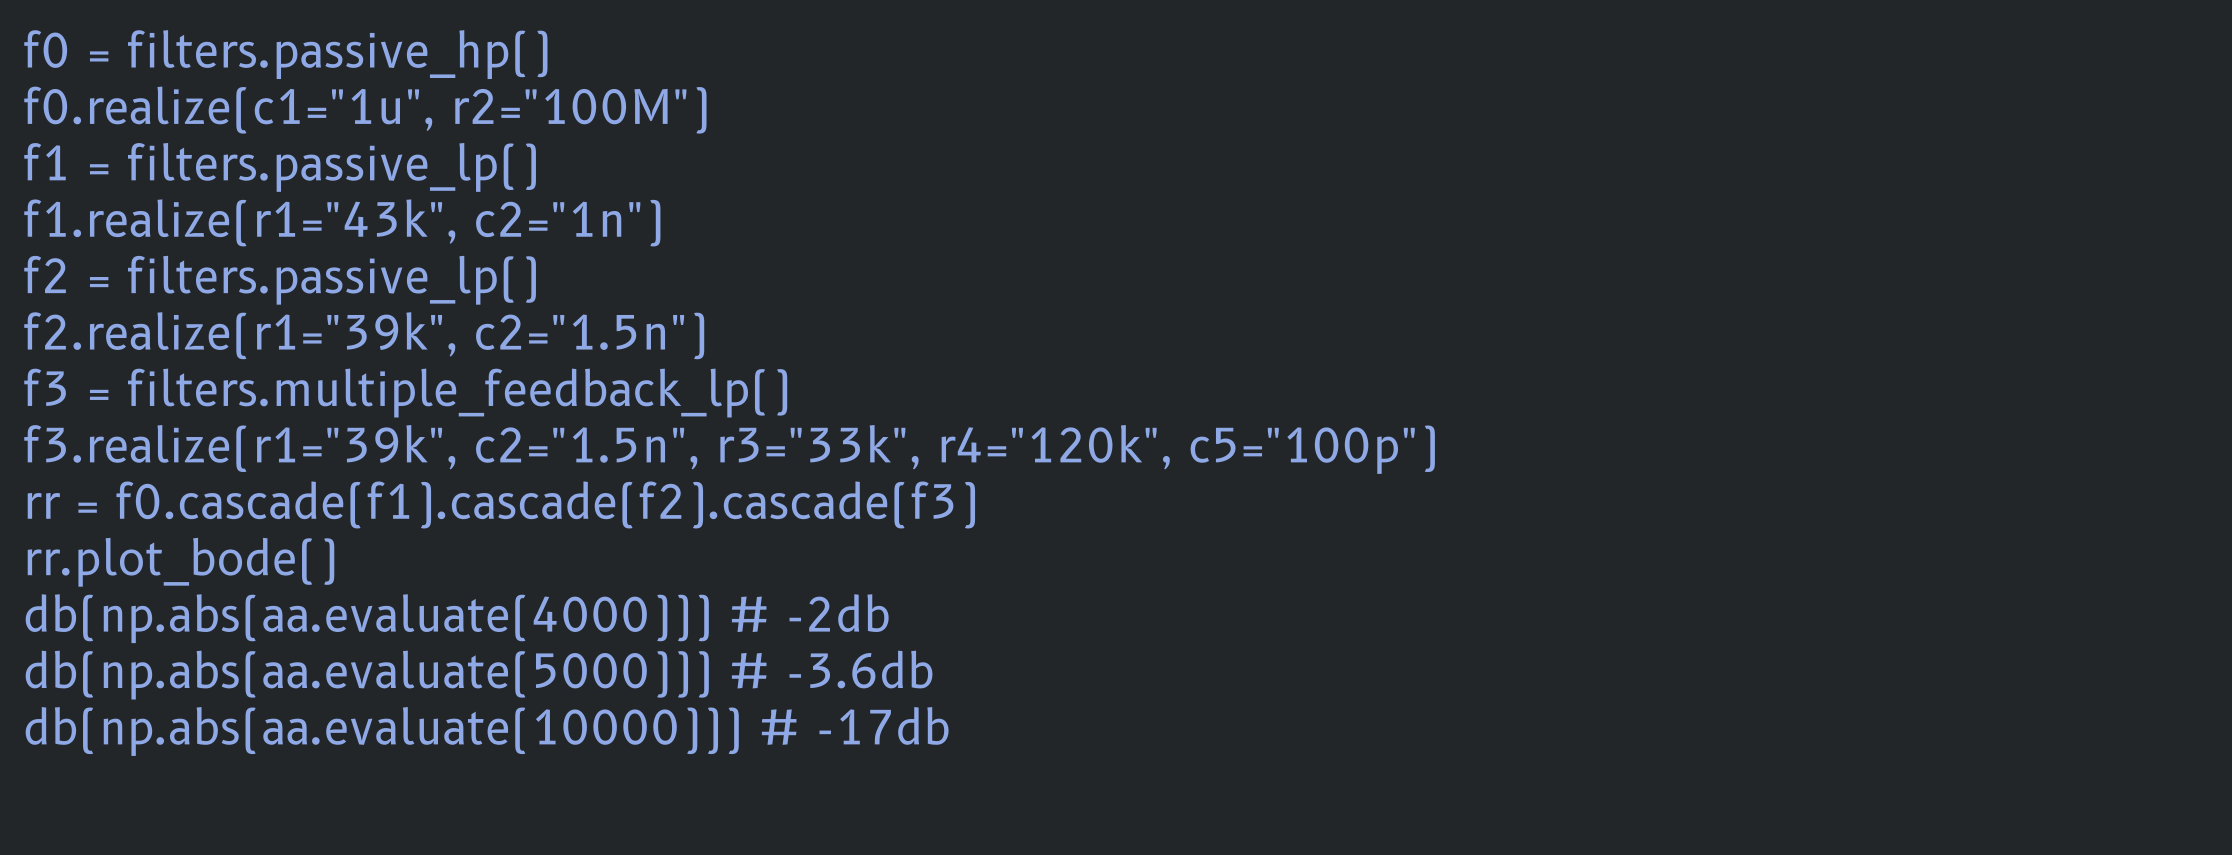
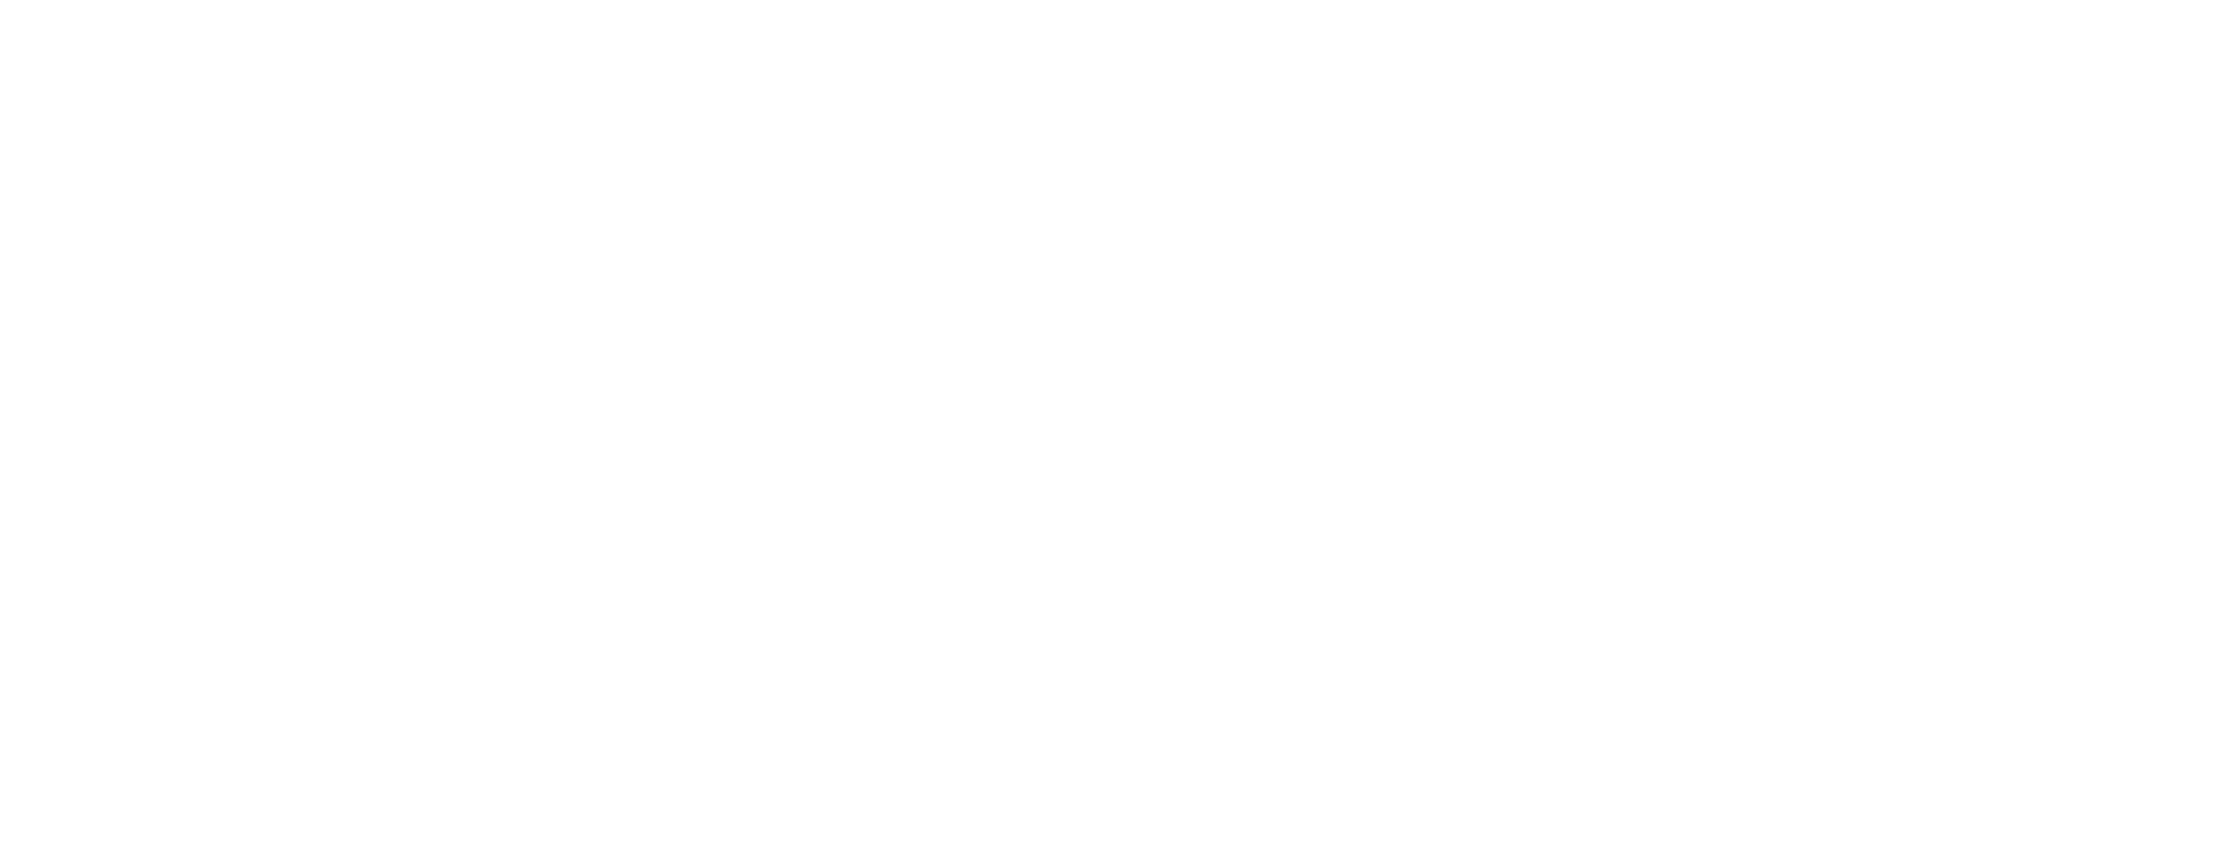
text: f0 = filters.passive_hp() (285, 54) -> none
text: f0.realize(c1="1u", r2="100M") (365, 110) -> none
text: f1 = filters.passive_lp() (280, 167) -> none
text: f1.realize(r1="43k", c2="1n") (342, 222) -> none
text: f2 = filters.passive_lp() (280, 280) -> none
text: f2.realize(r1="39k", c2="1.5n") (364, 335) -> none
text: f3 = filters.multiple_feedback_lp() (405, 393) -> none
text: f3.realize(r1="39k", c2="1.5n", r3="33k", r4="120k", c5="100p") (729, 449) -> none
text: rr = f0.cascade(f1).cascade(f2).cascade(f3) (501, 504) -> none
text: rr.plot_bode() (180, 562) -> none
text: db(np.abs(aa.evaluate(4000))) # -2db (457, 618) -> none
text: db(np.abs(aa.evaluate(5000))) # -3.6db (479, 675) -> none
text: db(np.abs(aa.evaluate(10000))) # -17db (487, 731) -> none

